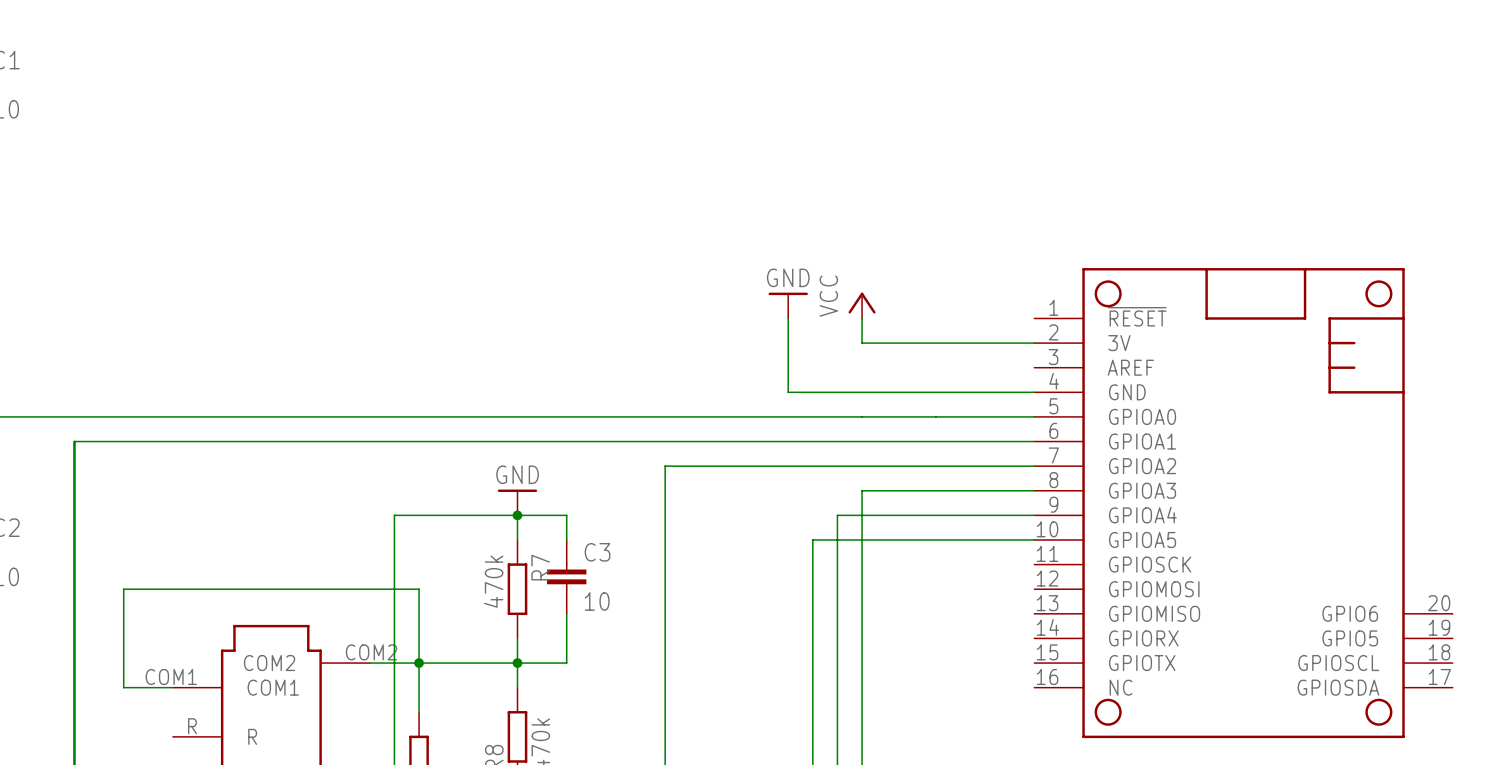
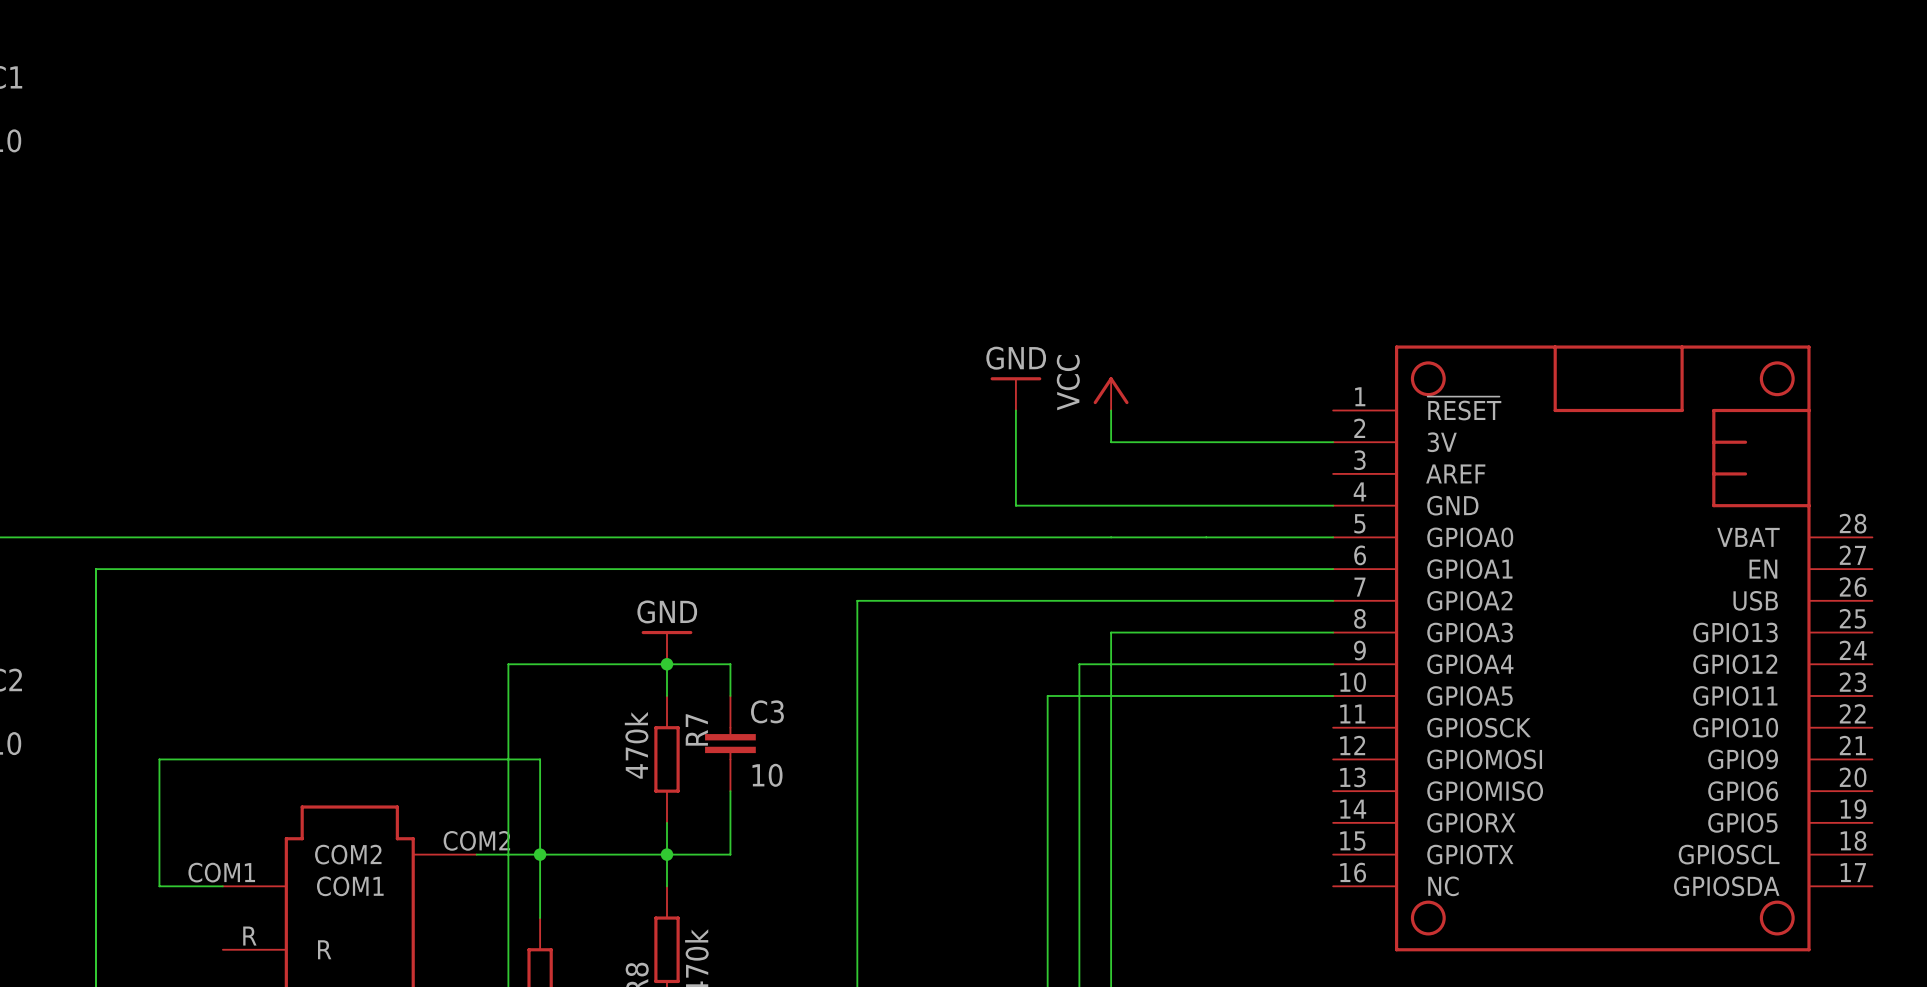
part symbol: [1034, 268, 1453, 739] -> [1333, 345, 1873, 952]

